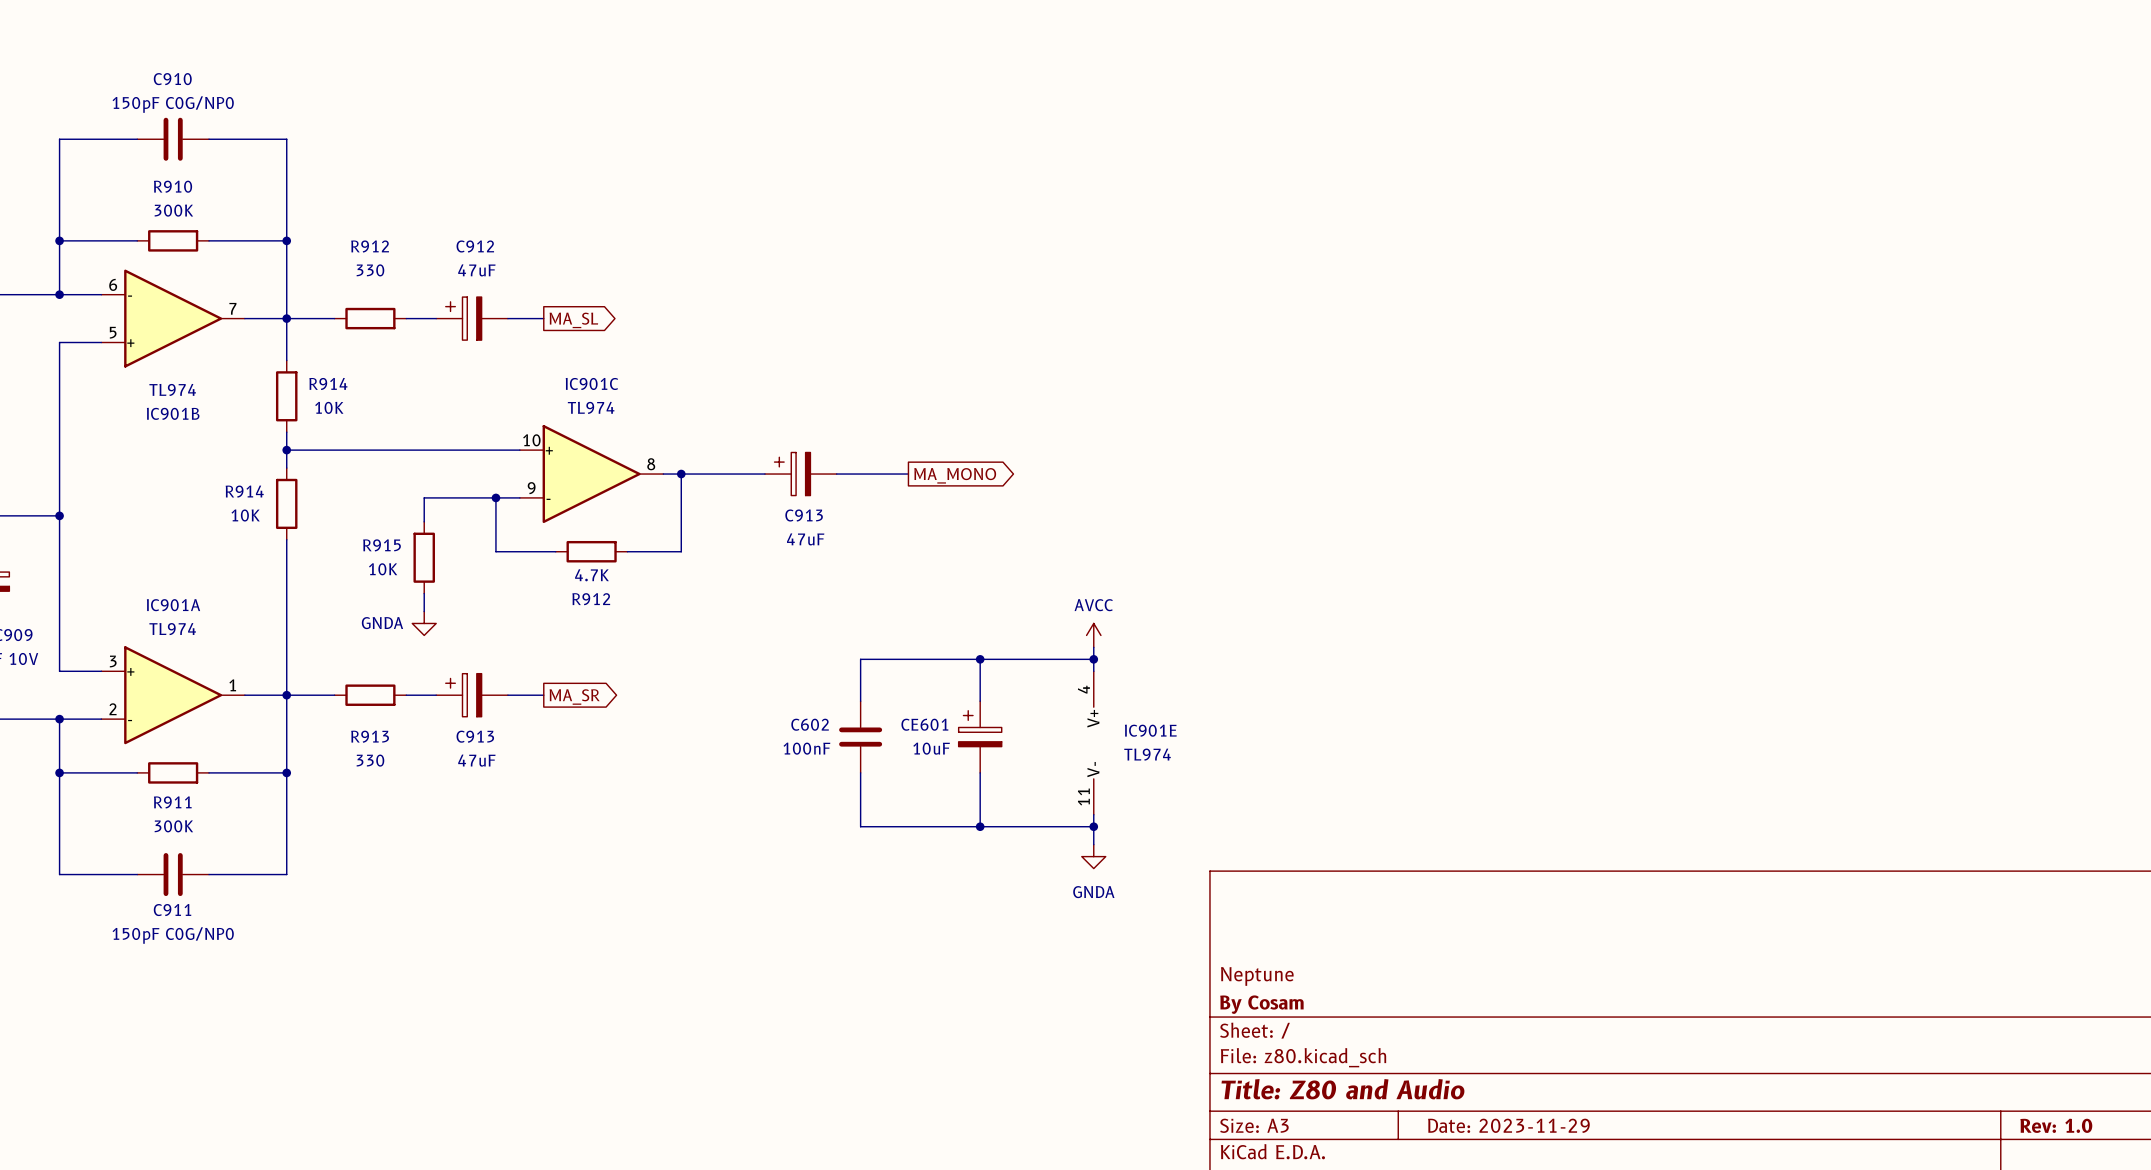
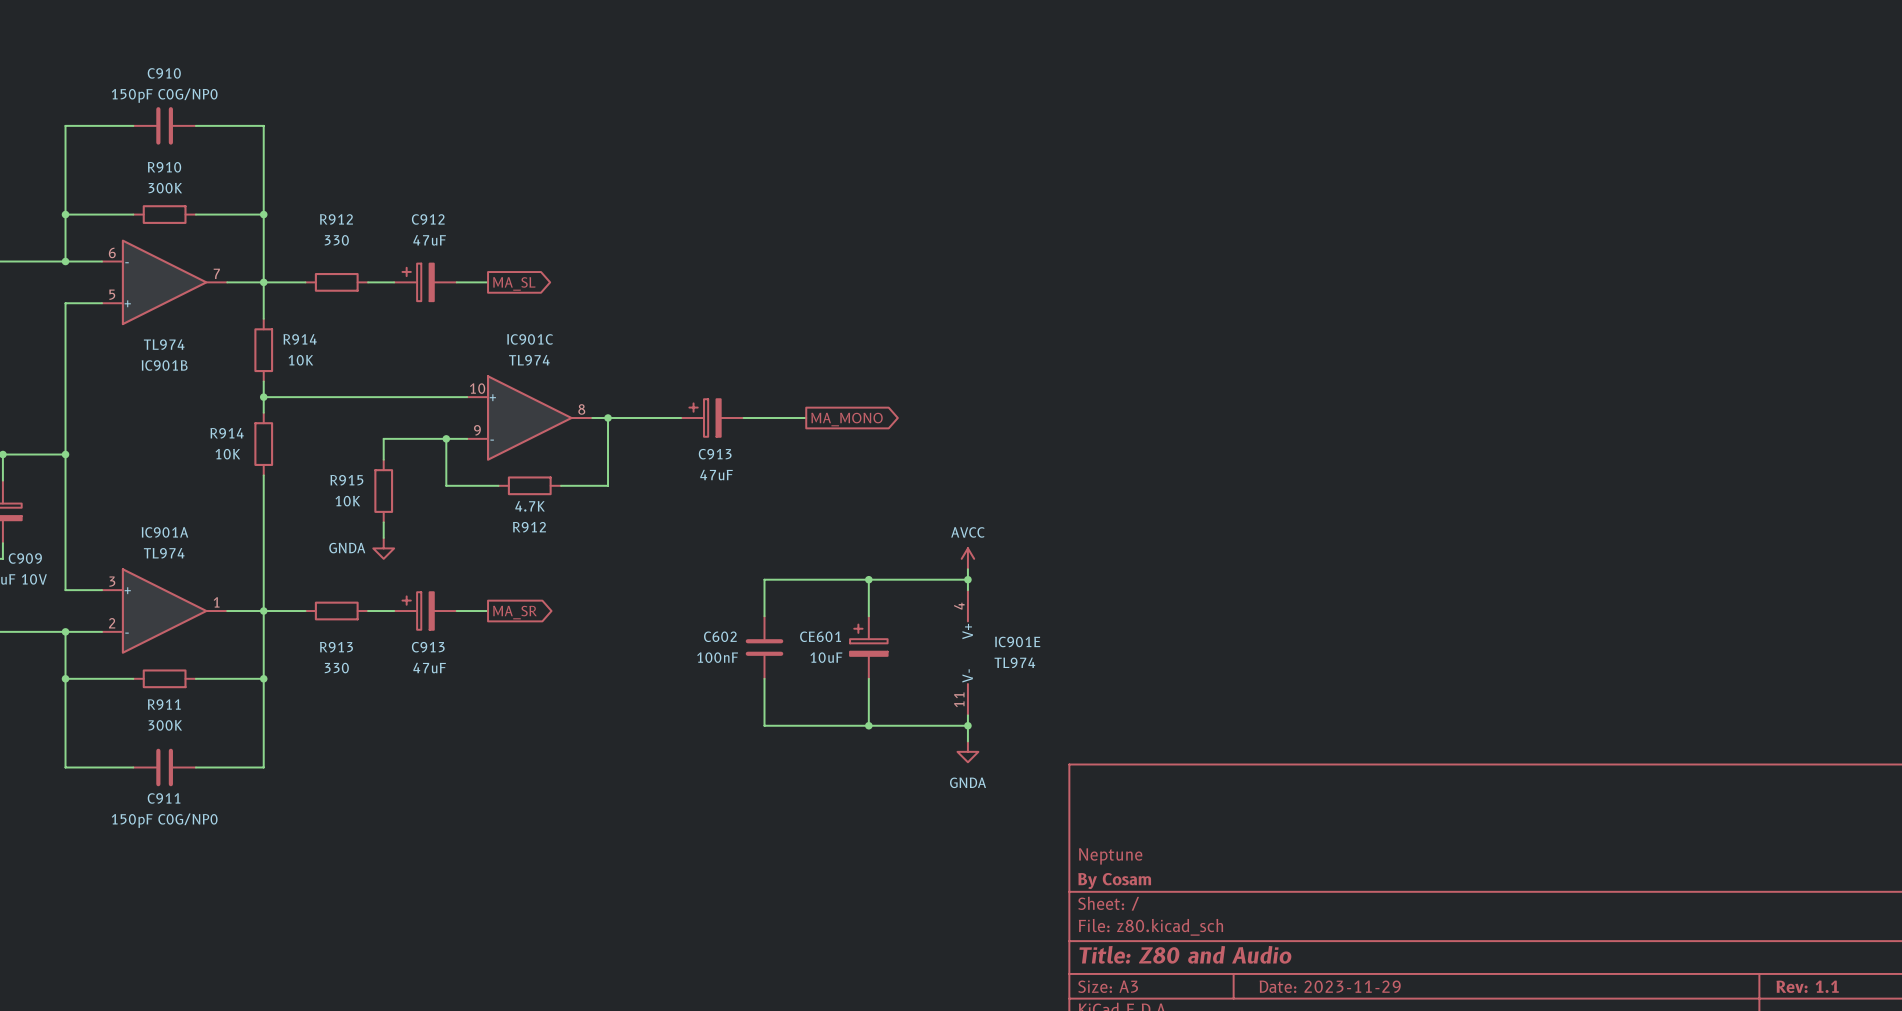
title block: Rev: 1.0 (2056, 1125) -> Rev: 1.1 (1807, 986)

